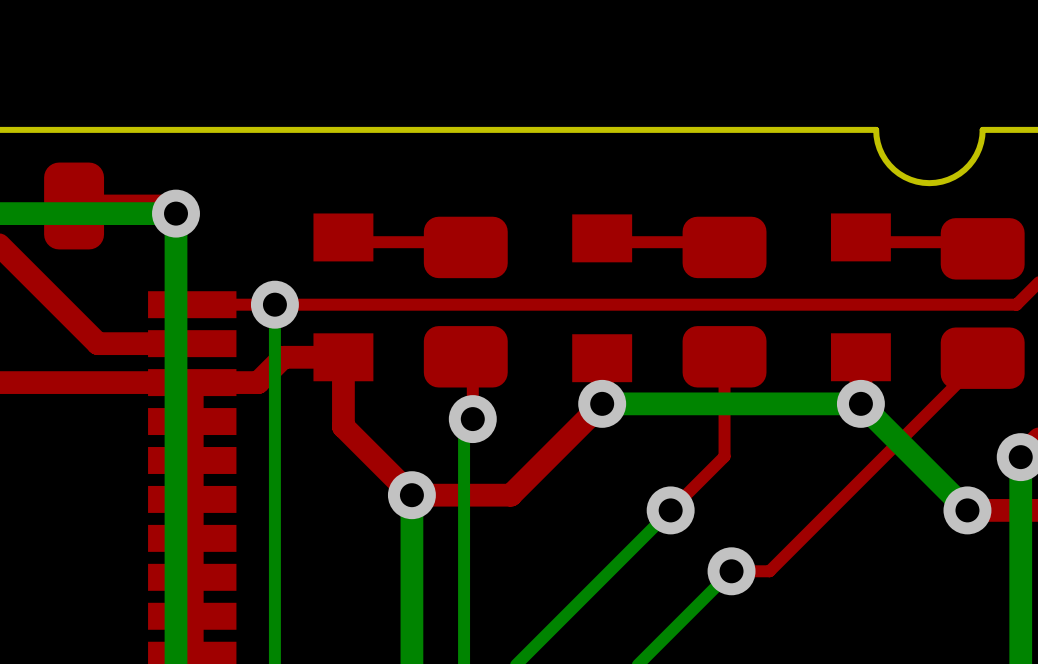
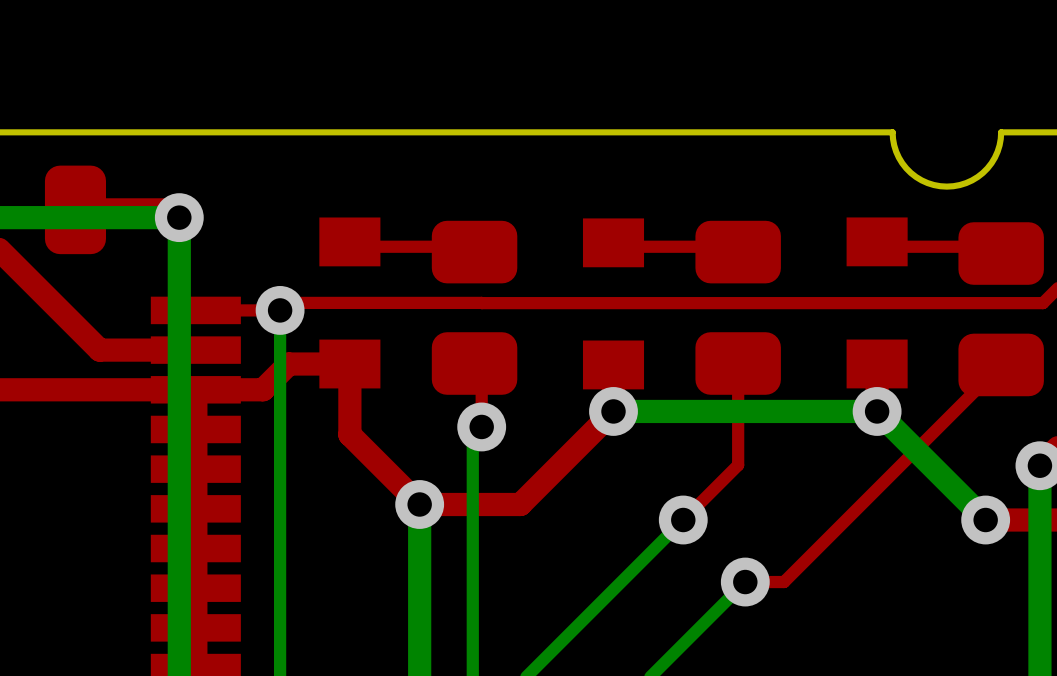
top track: none -> (481, 302) (287, 302) (280, 310)
top track: (1023, 297) (1016, 304) (274, 304) -> (1042, 303) (481, 303)

